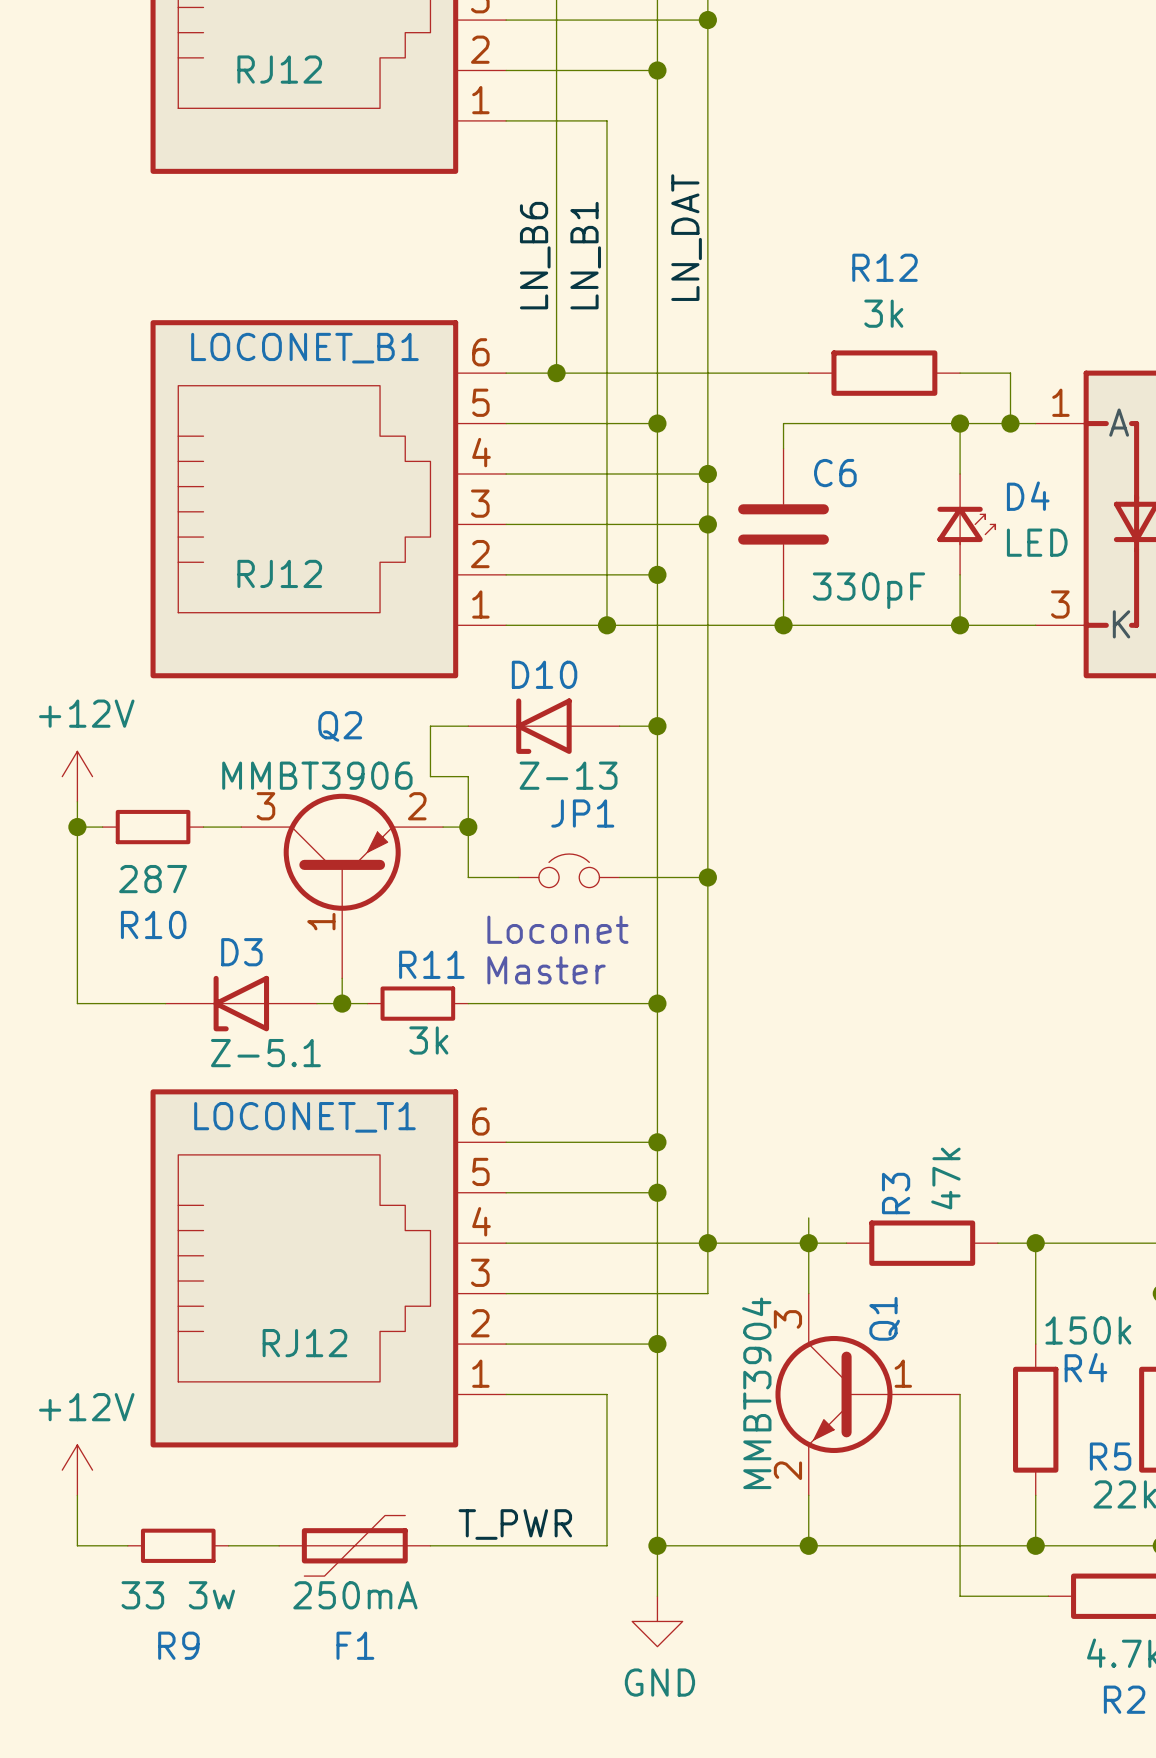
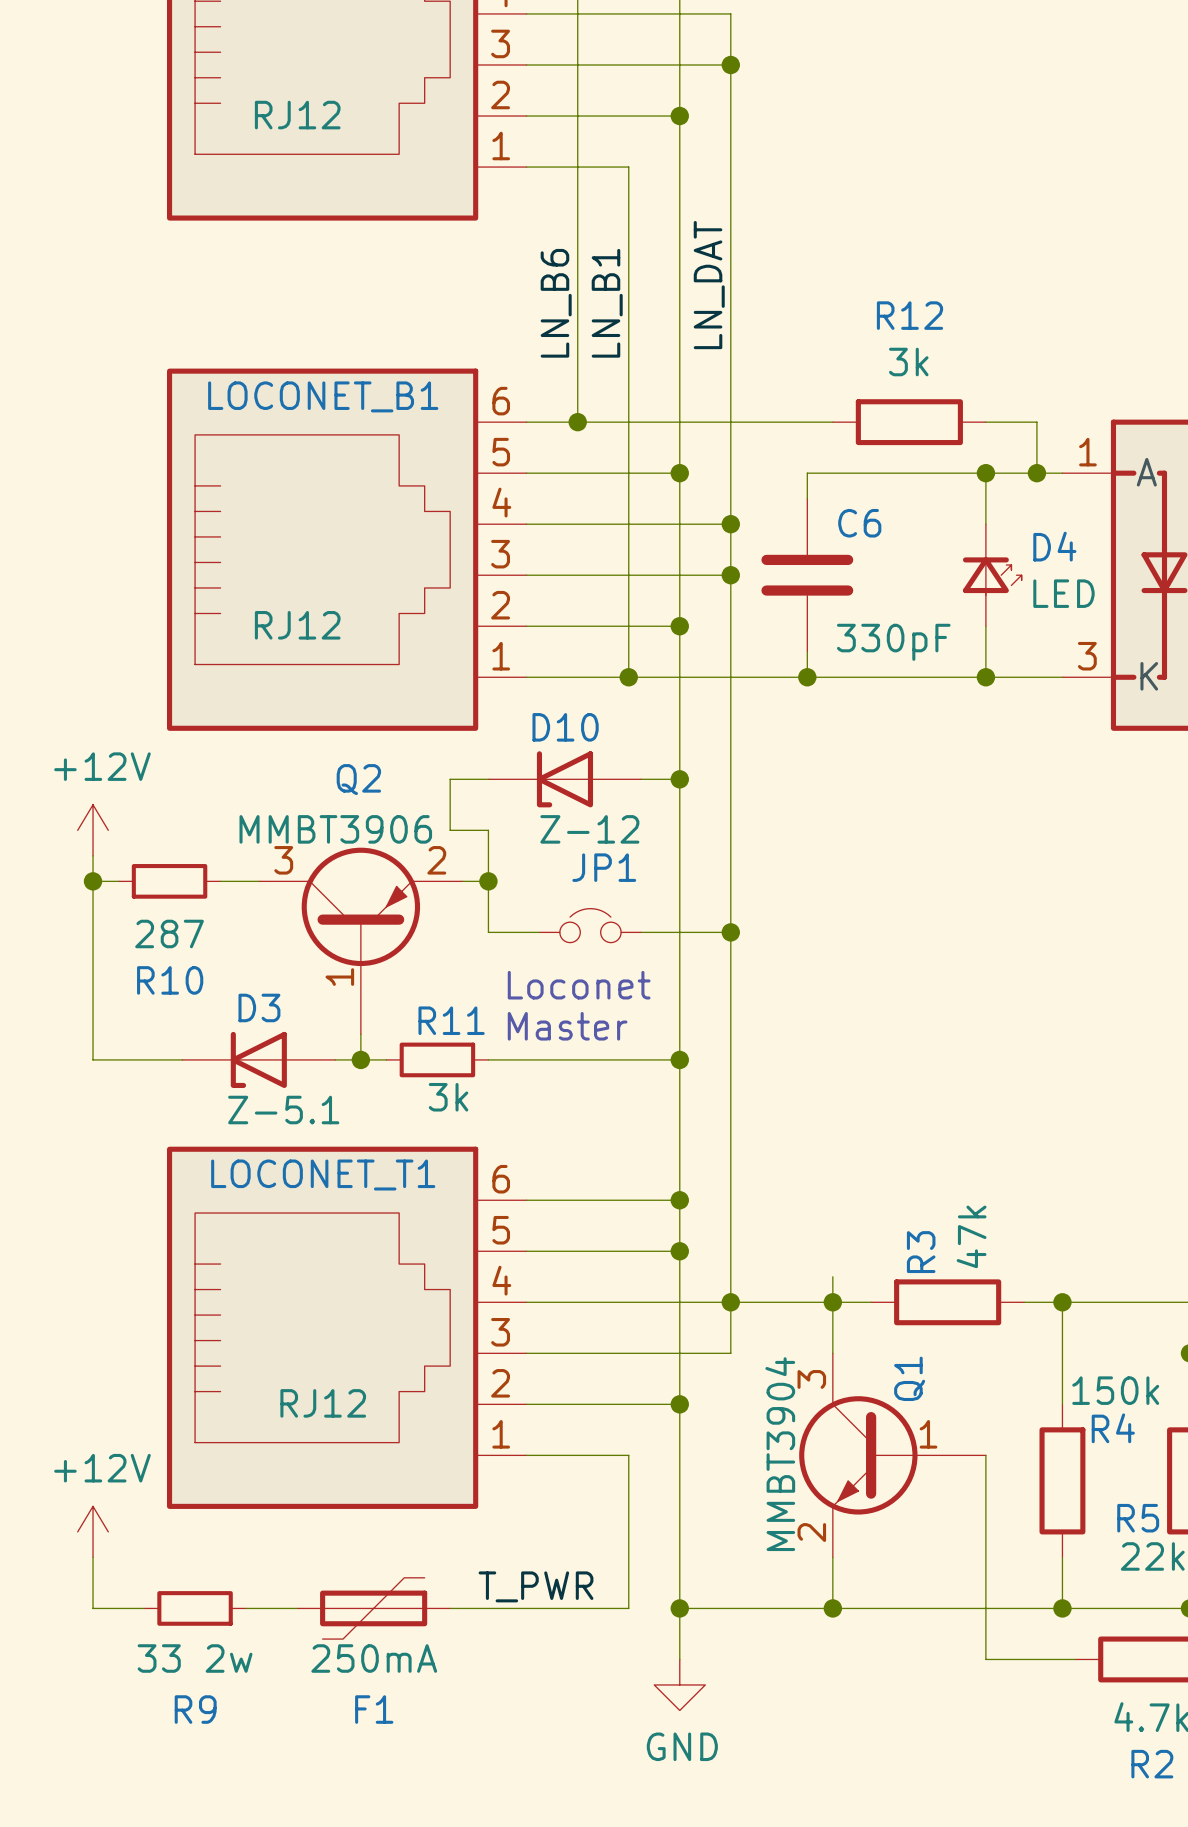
D10 value: Z-13 (568, 775) -> Z-12 (589, 829)
R9 value: 33 3w (178, 1595) -> 33 2w (195, 1658)

